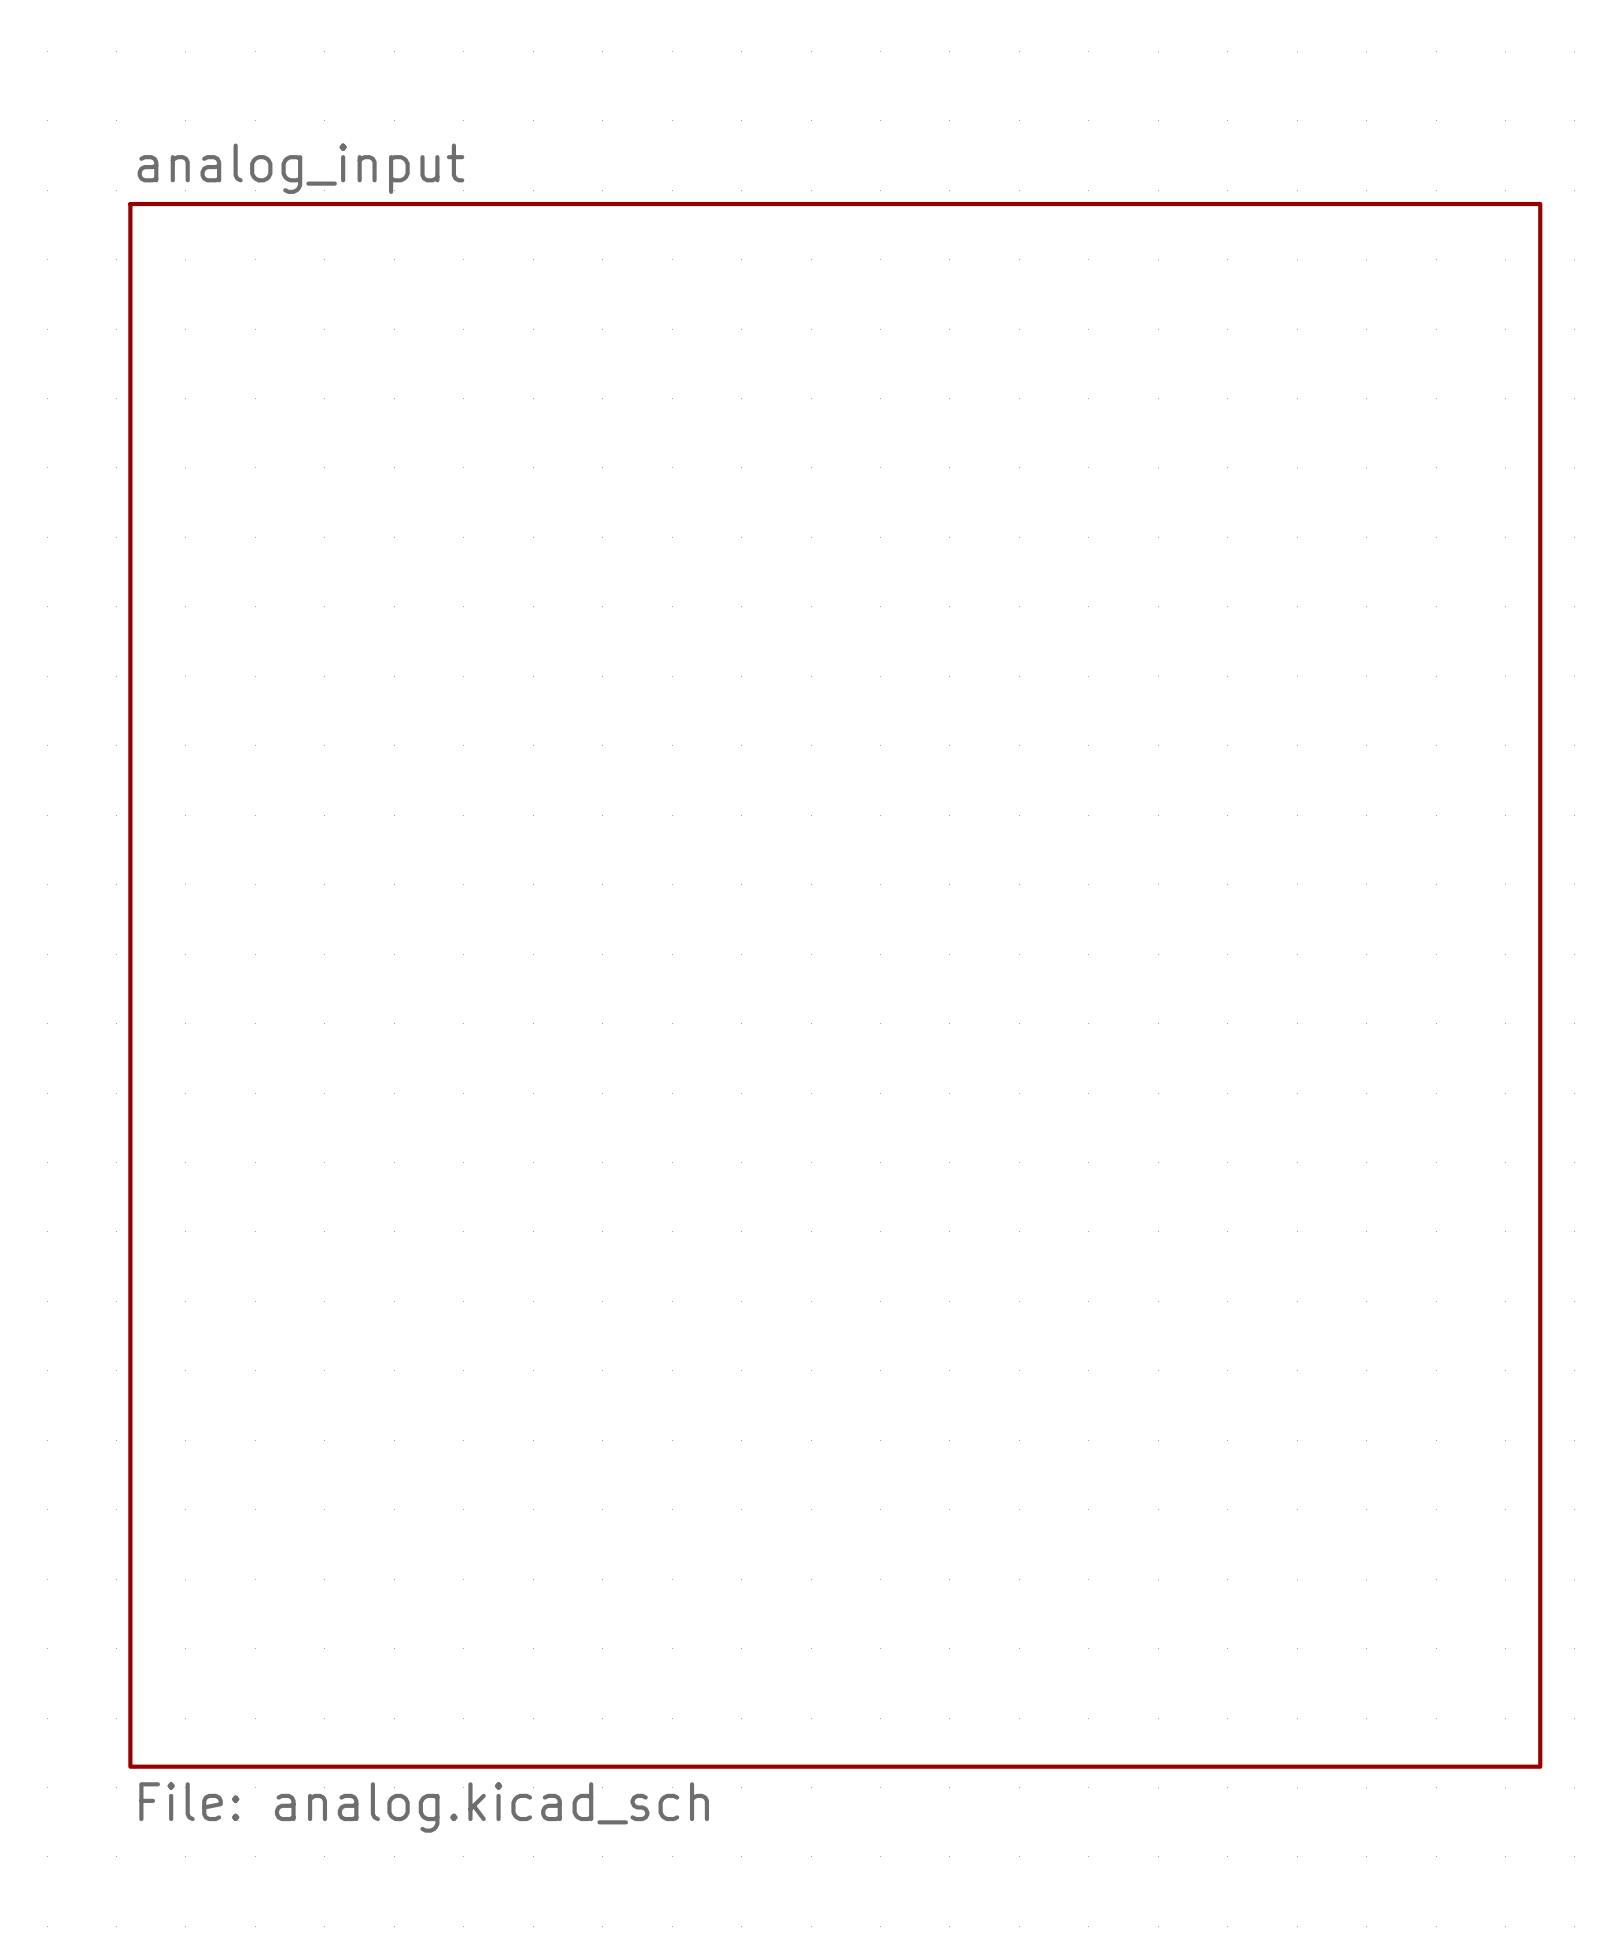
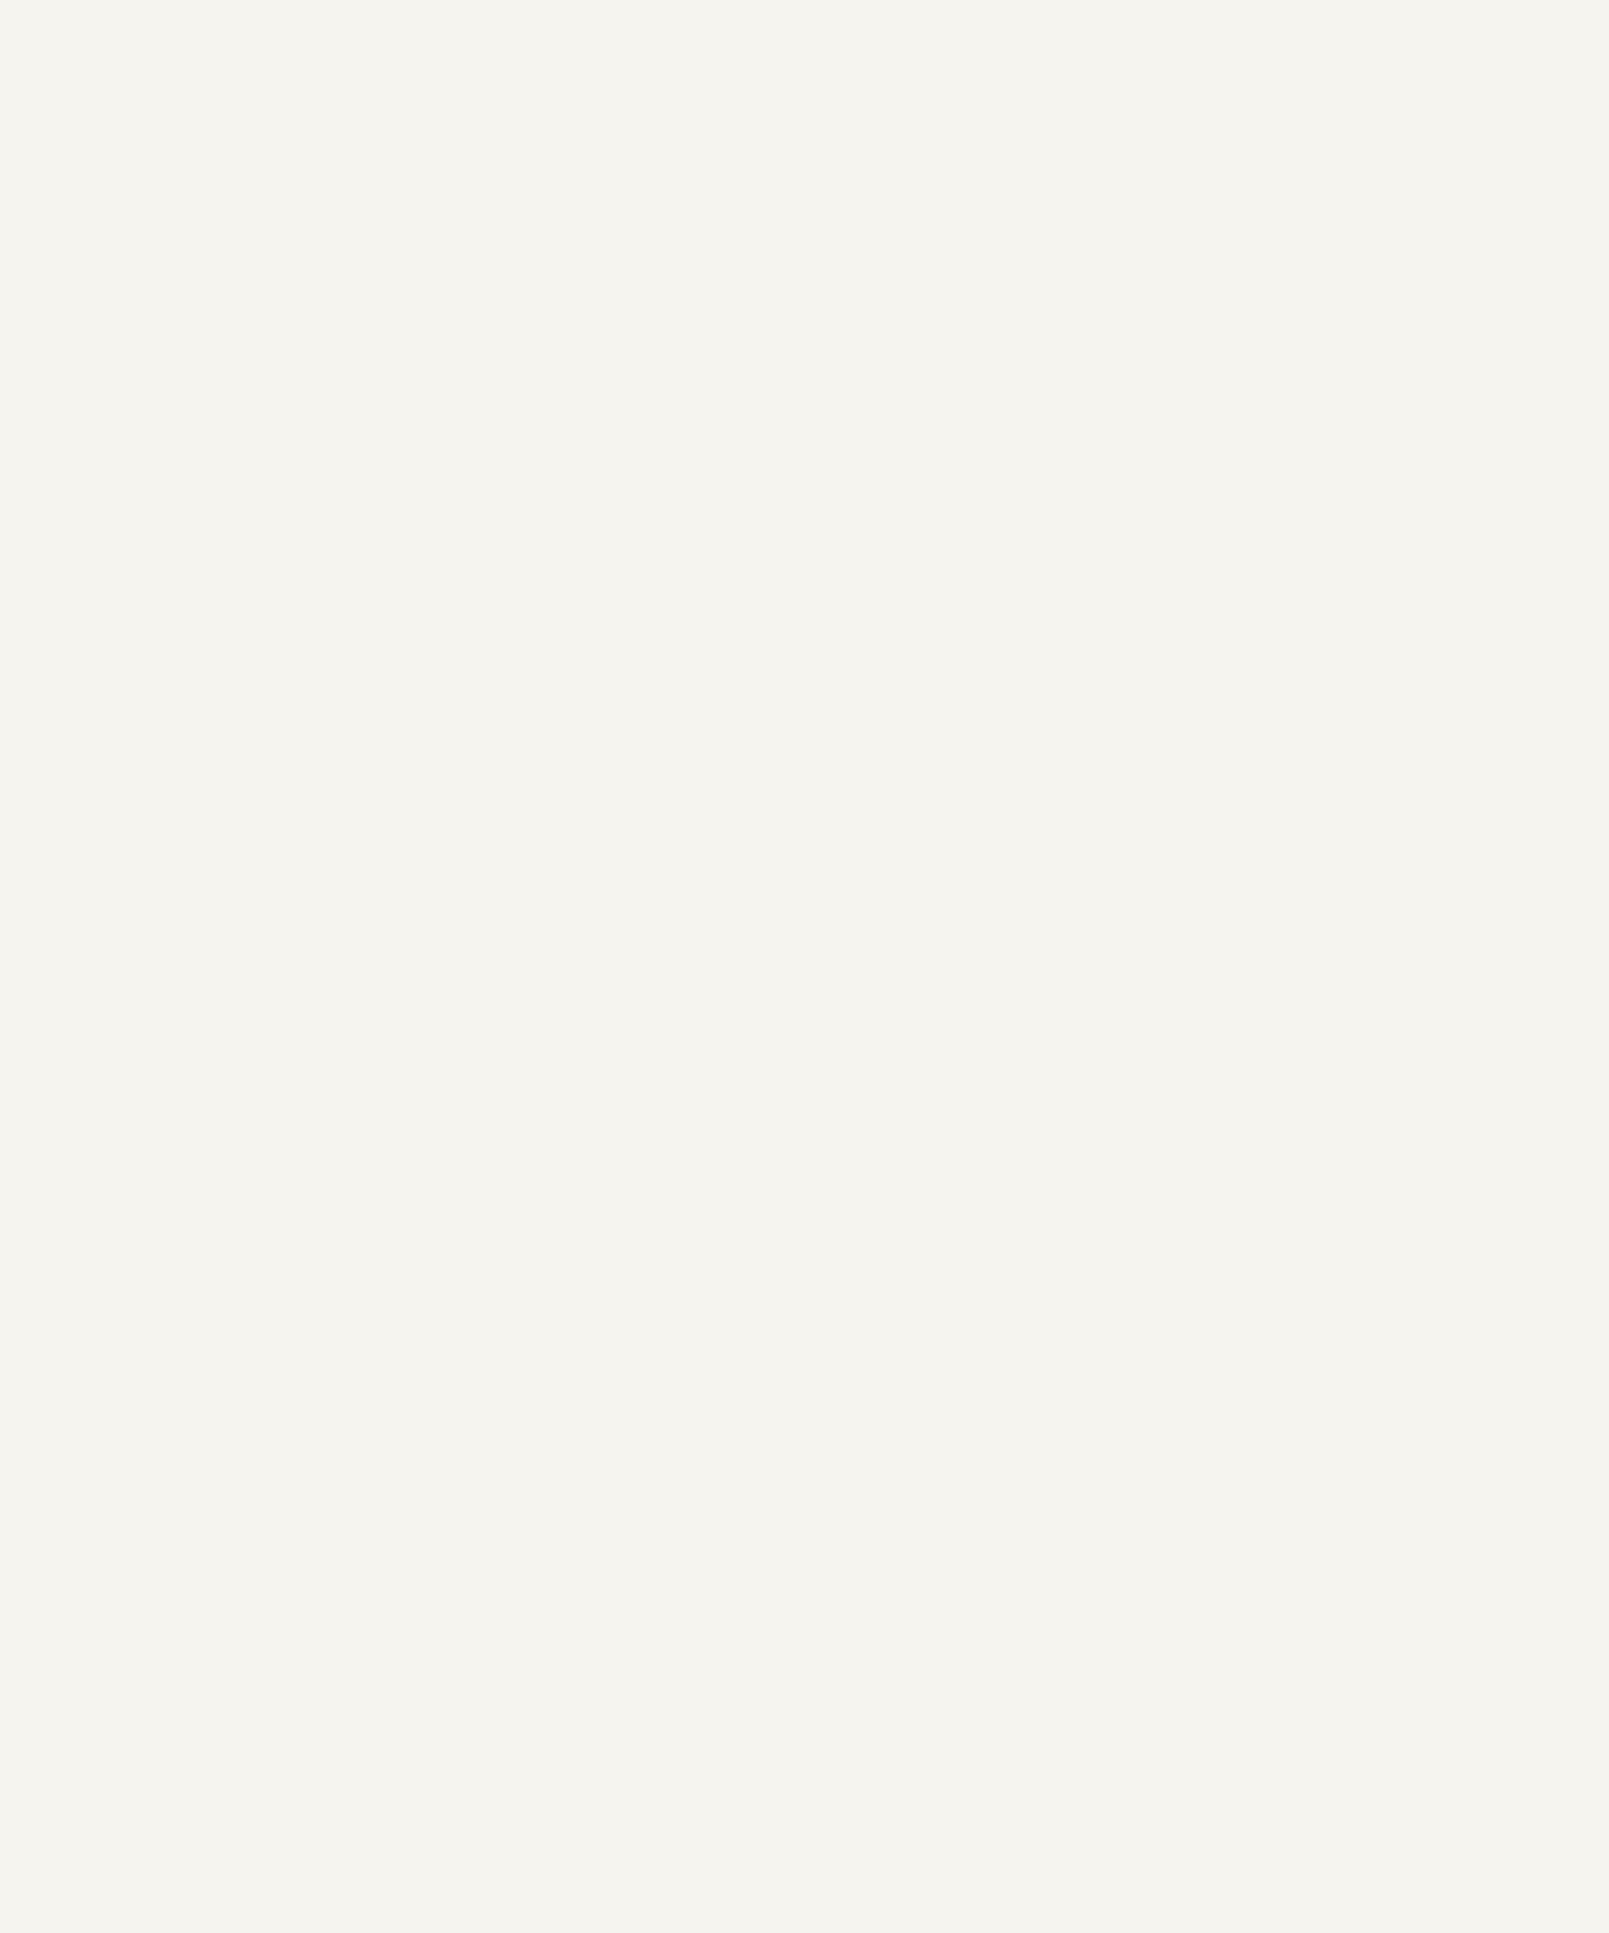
sheet analog_input: File: analog.kicad_sch (835, 985) -> none

